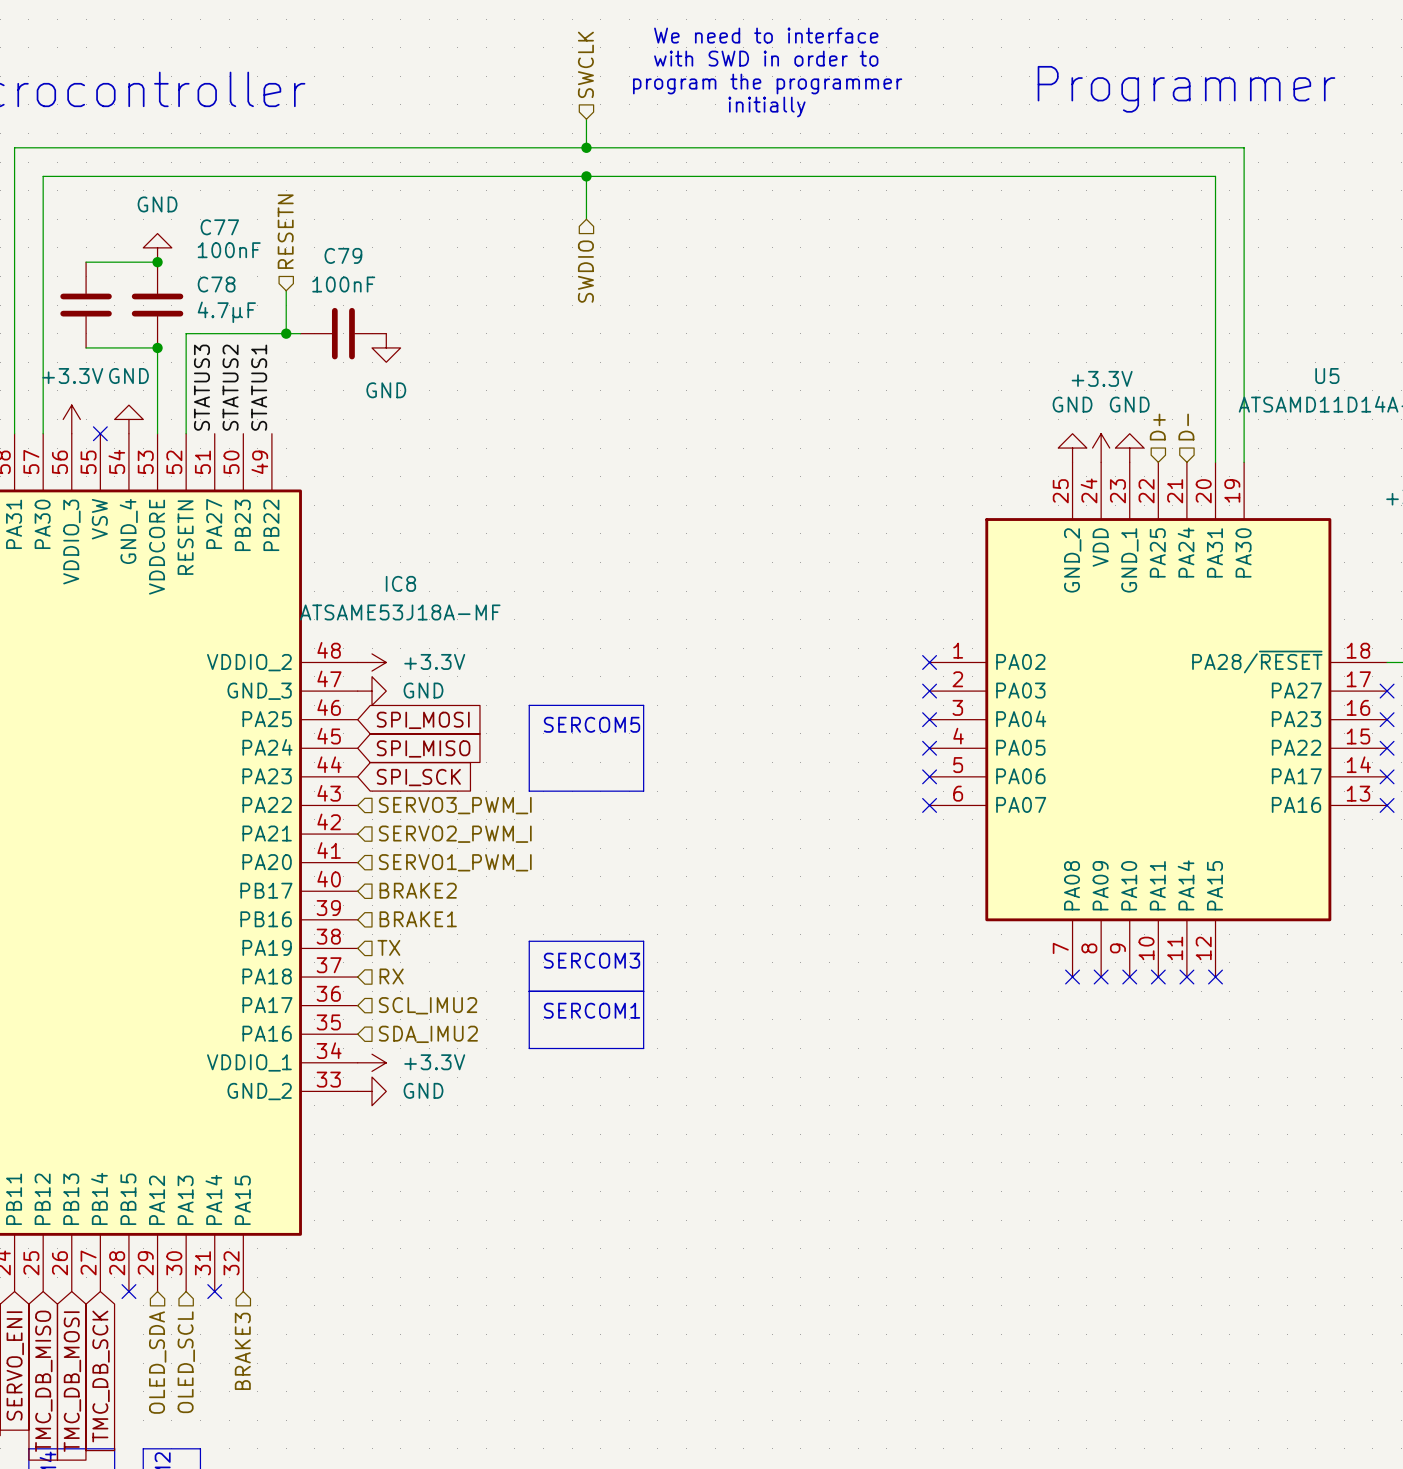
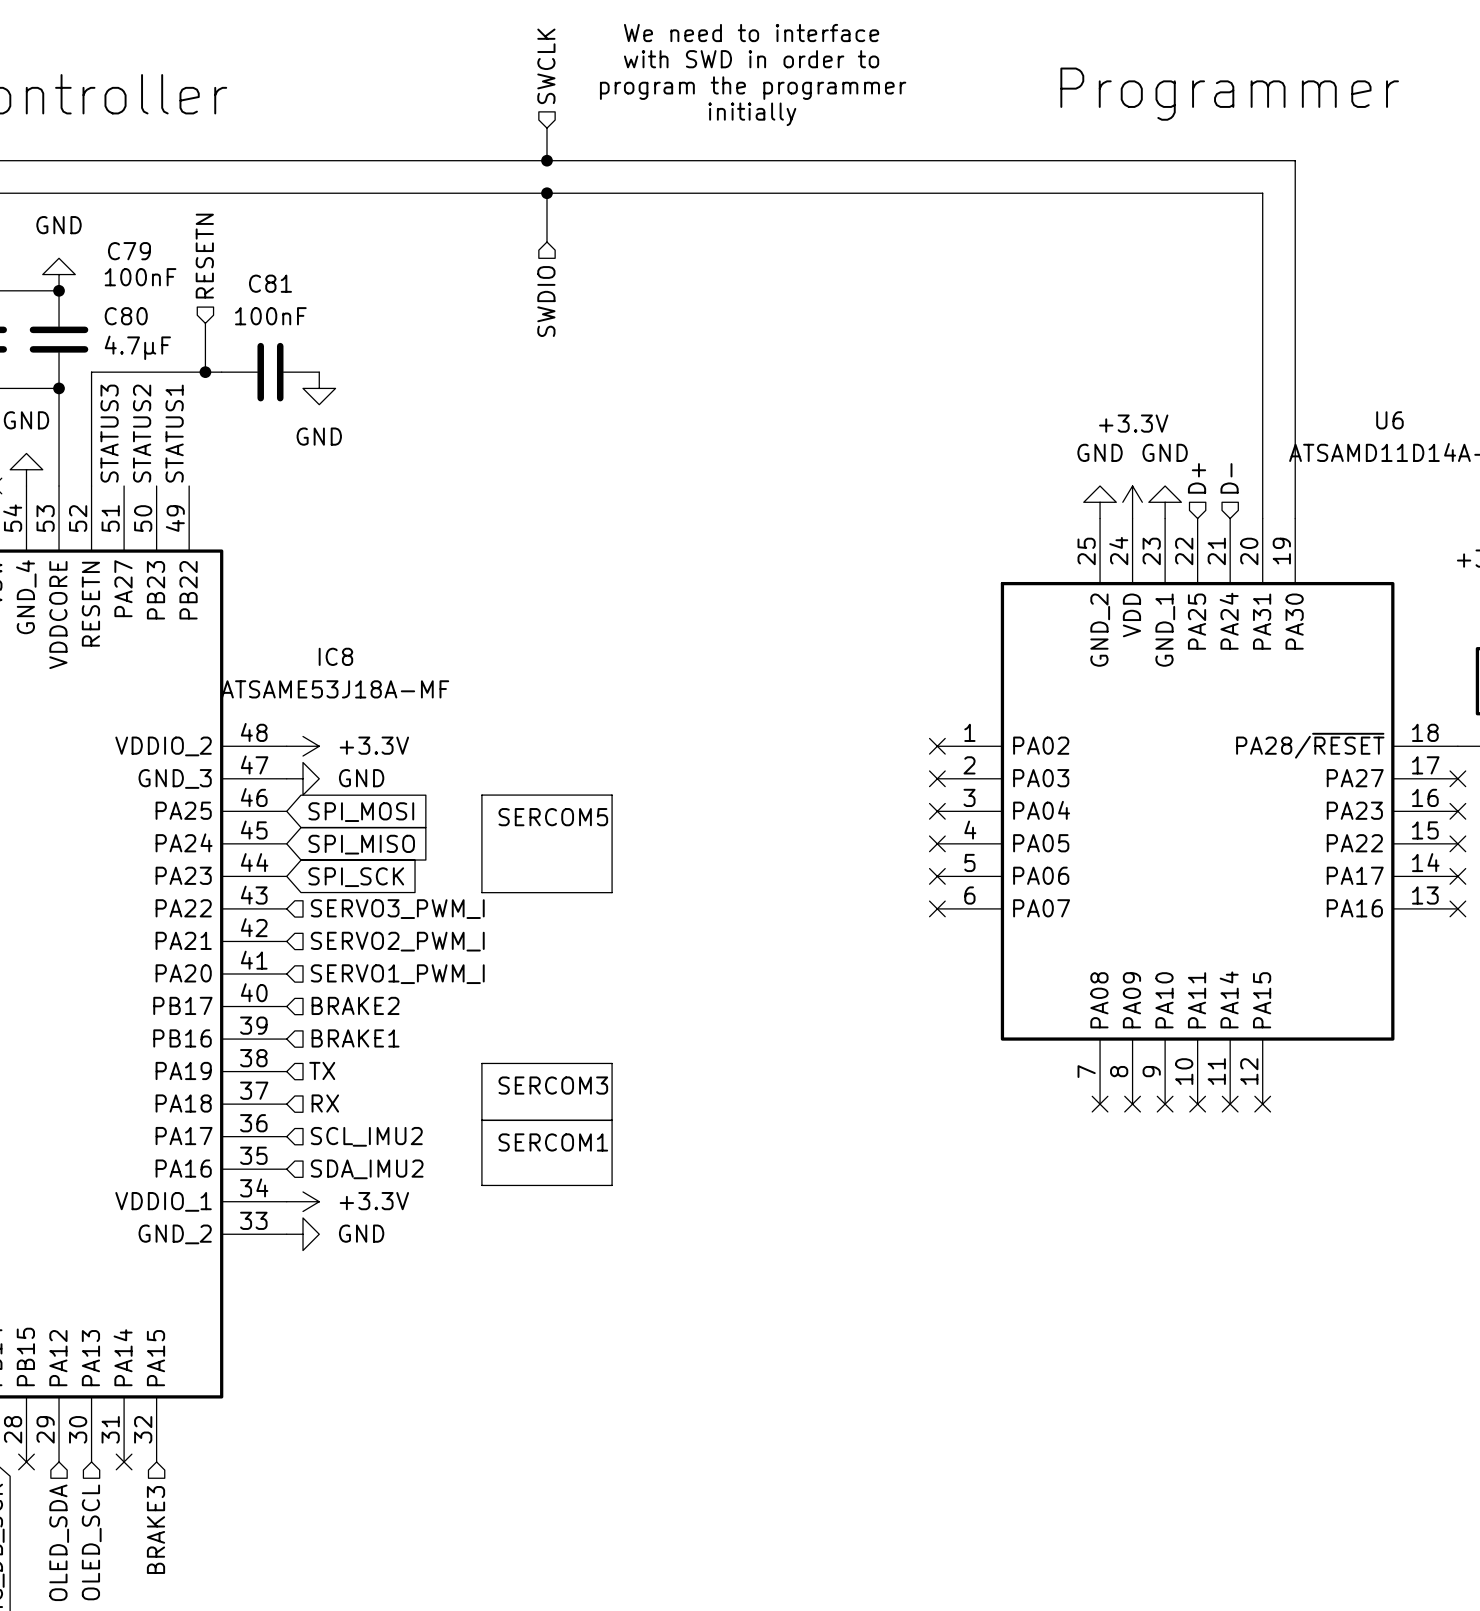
C77 name: C77 (219, 227) -> C79 (129, 251)
C79 name: C79 (343, 255) -> C81 (270, 283)
C78 name: C78 (216, 284) -> C80 (126, 316)
U5 name: U5 (1327, 376) -> U6 (1389, 420)

